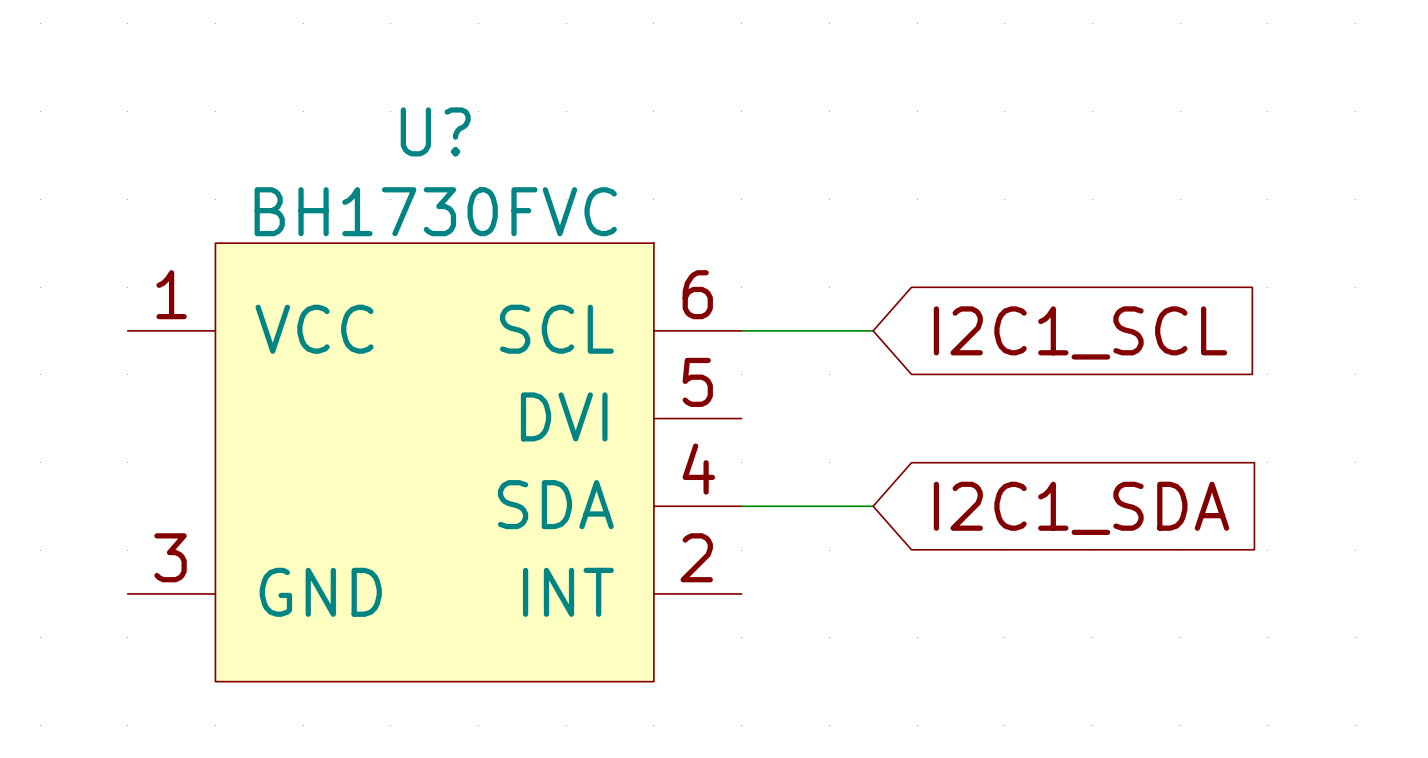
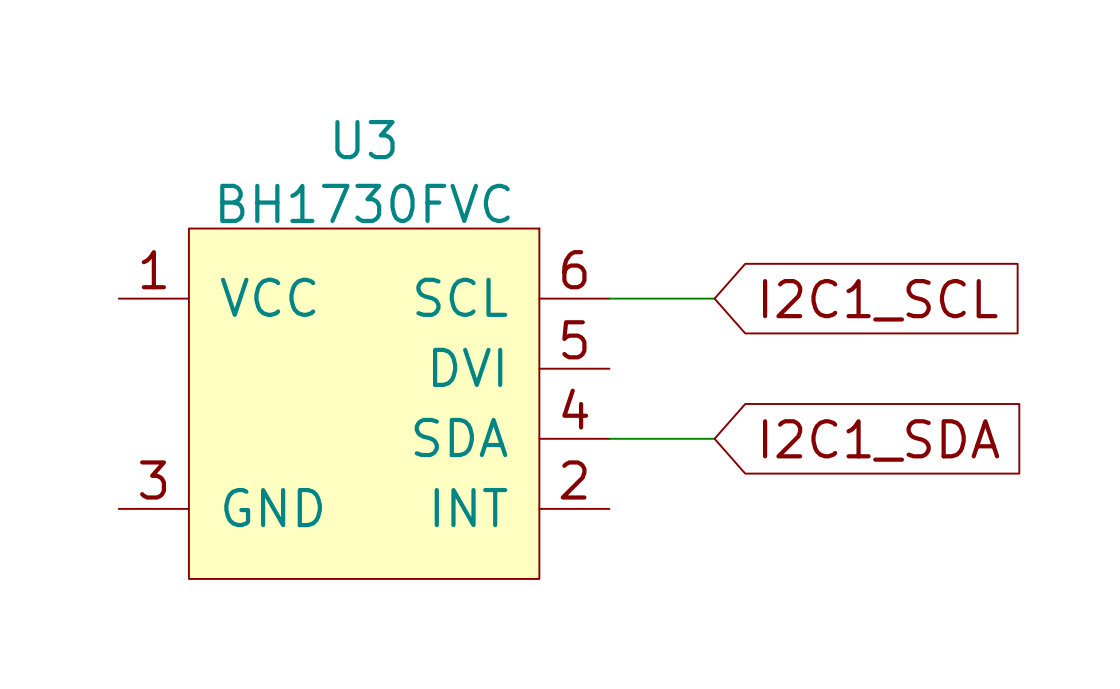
U? name: U? (435, 131) -> U3 (364, 139)

